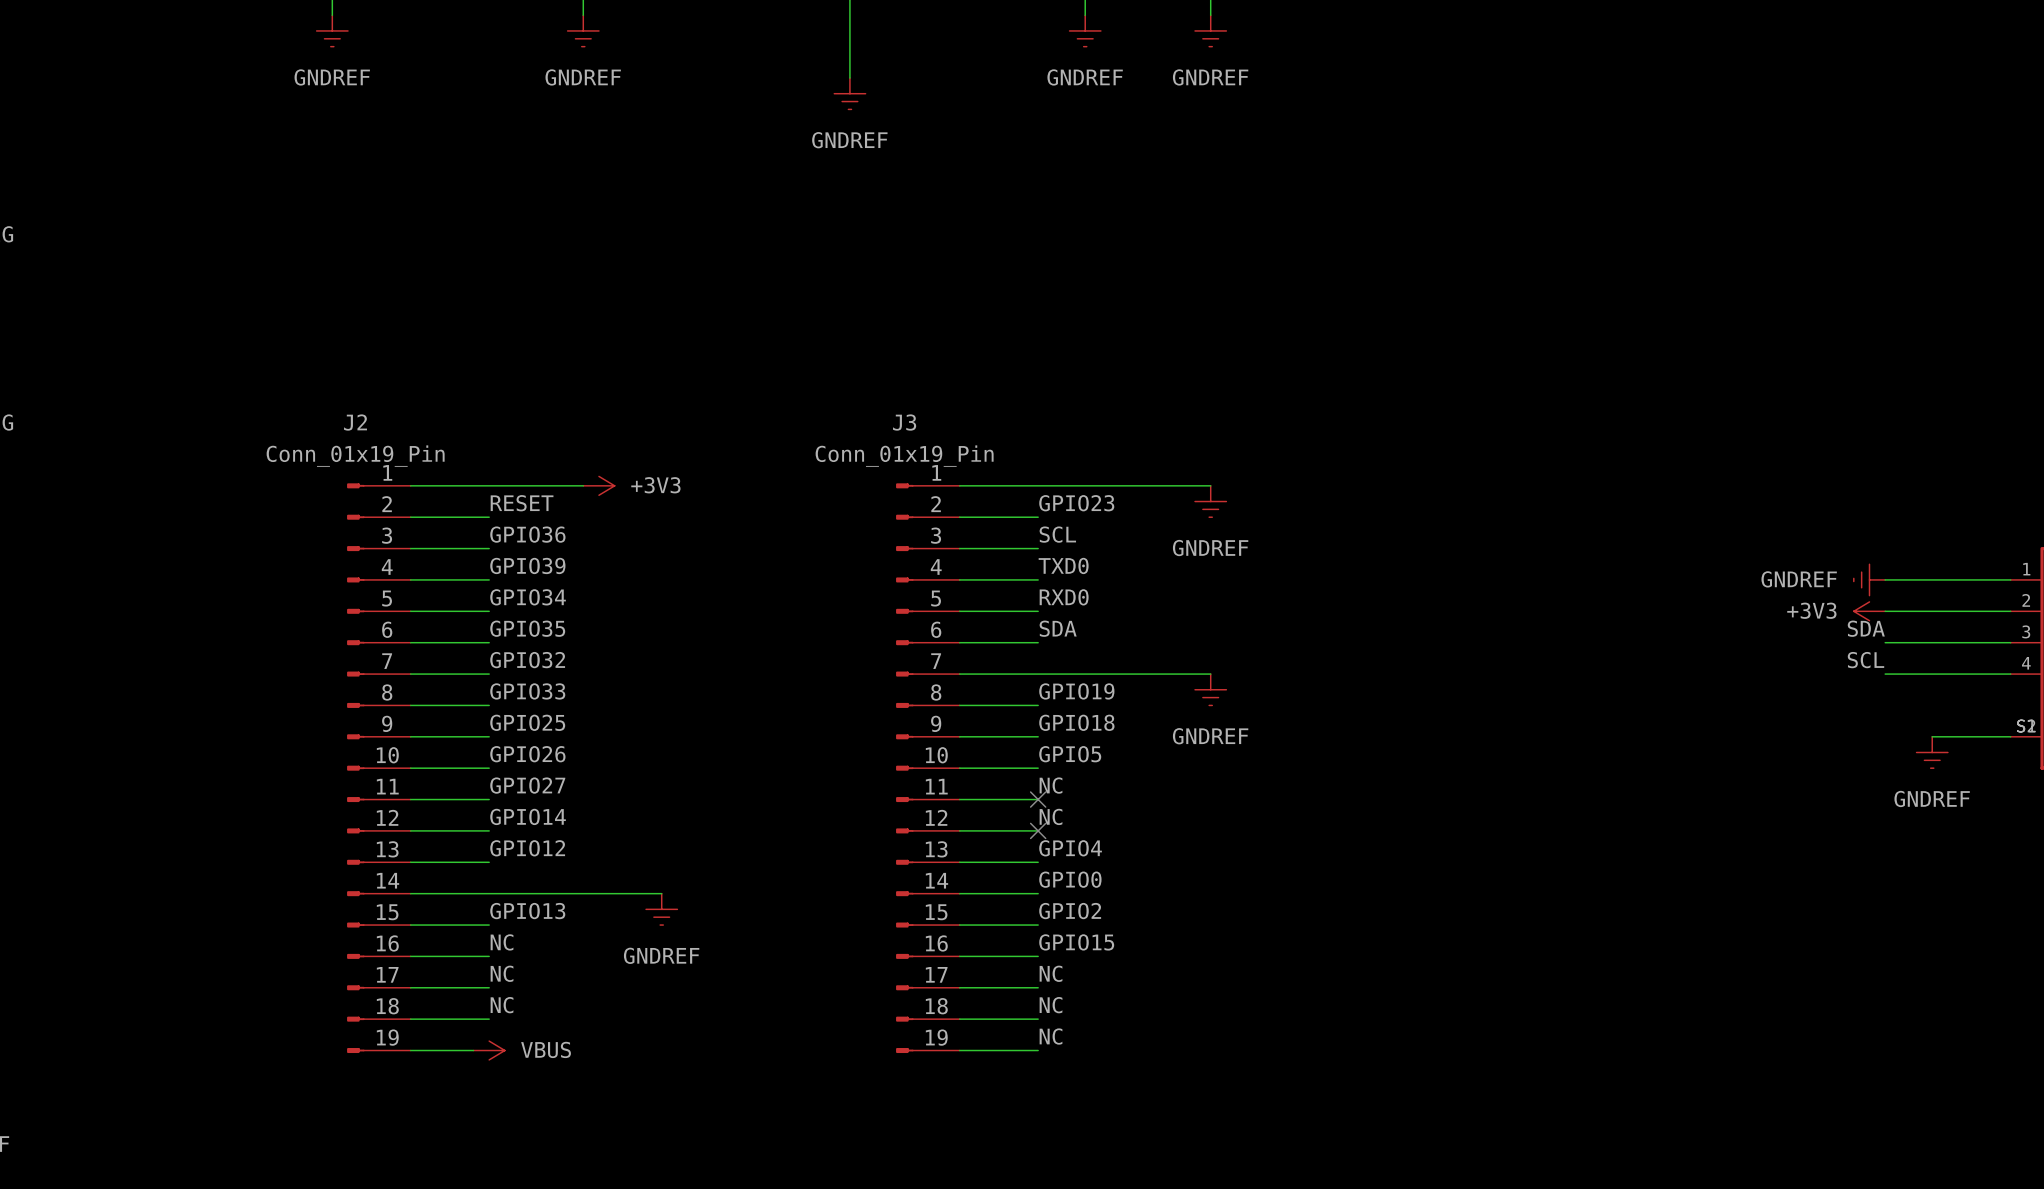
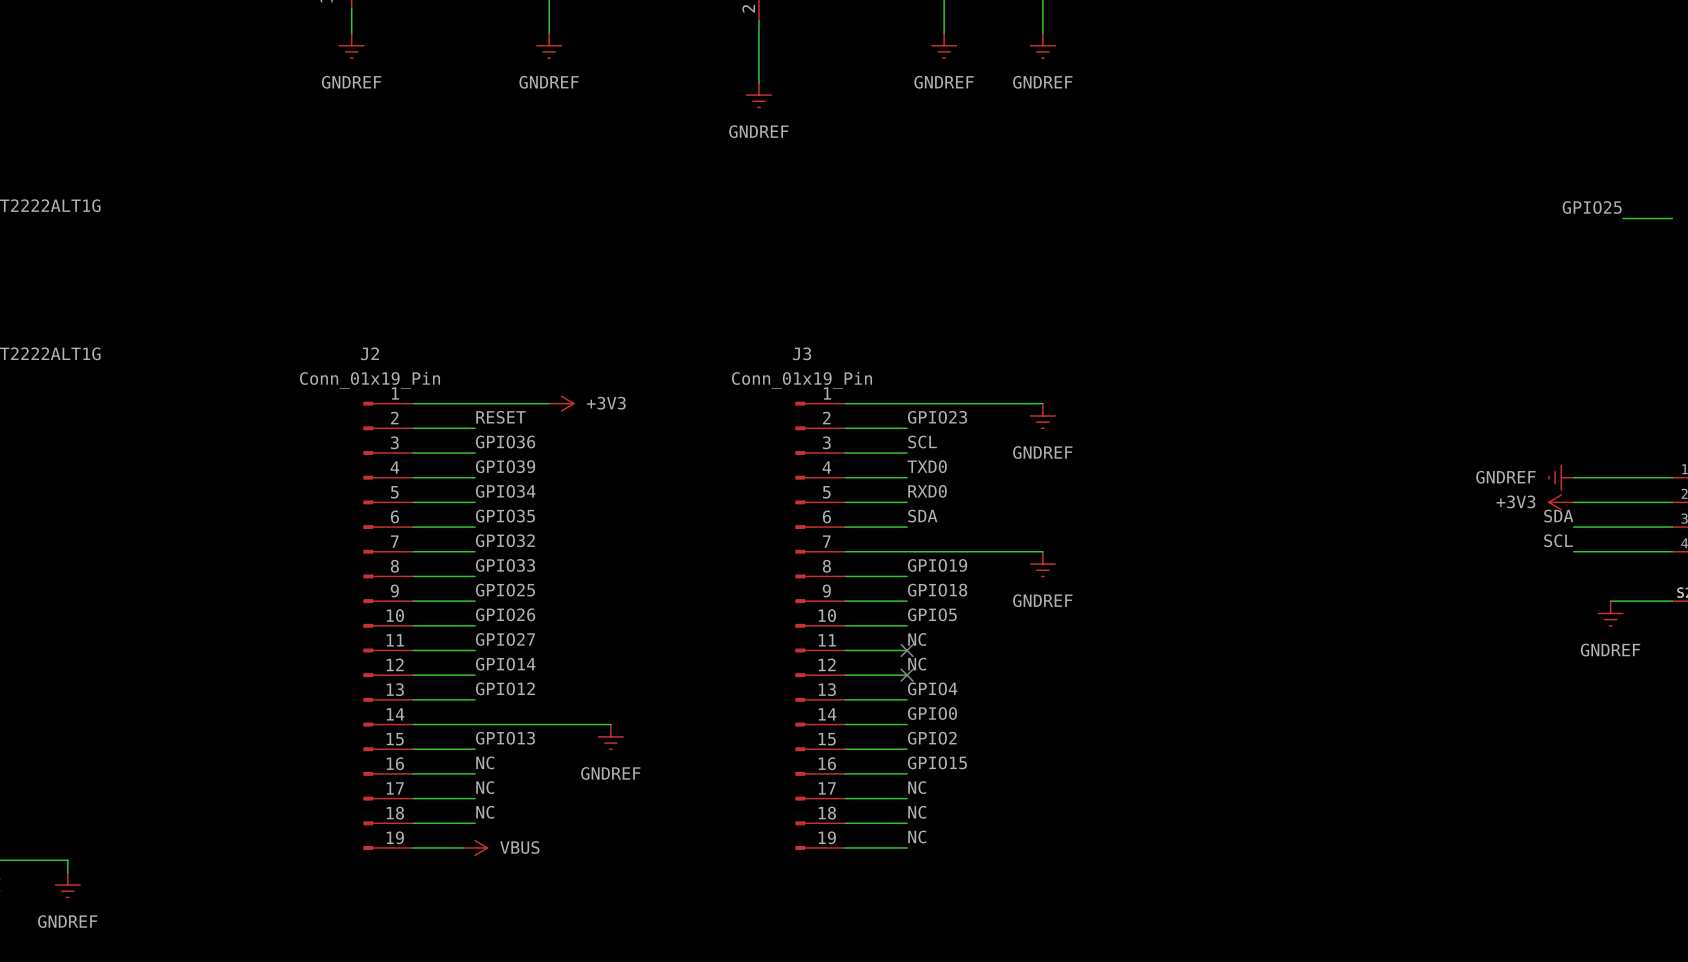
label: none -> GPIO25 (1592, 207)
wire: none -> (1622, 218) (1672, 218)

